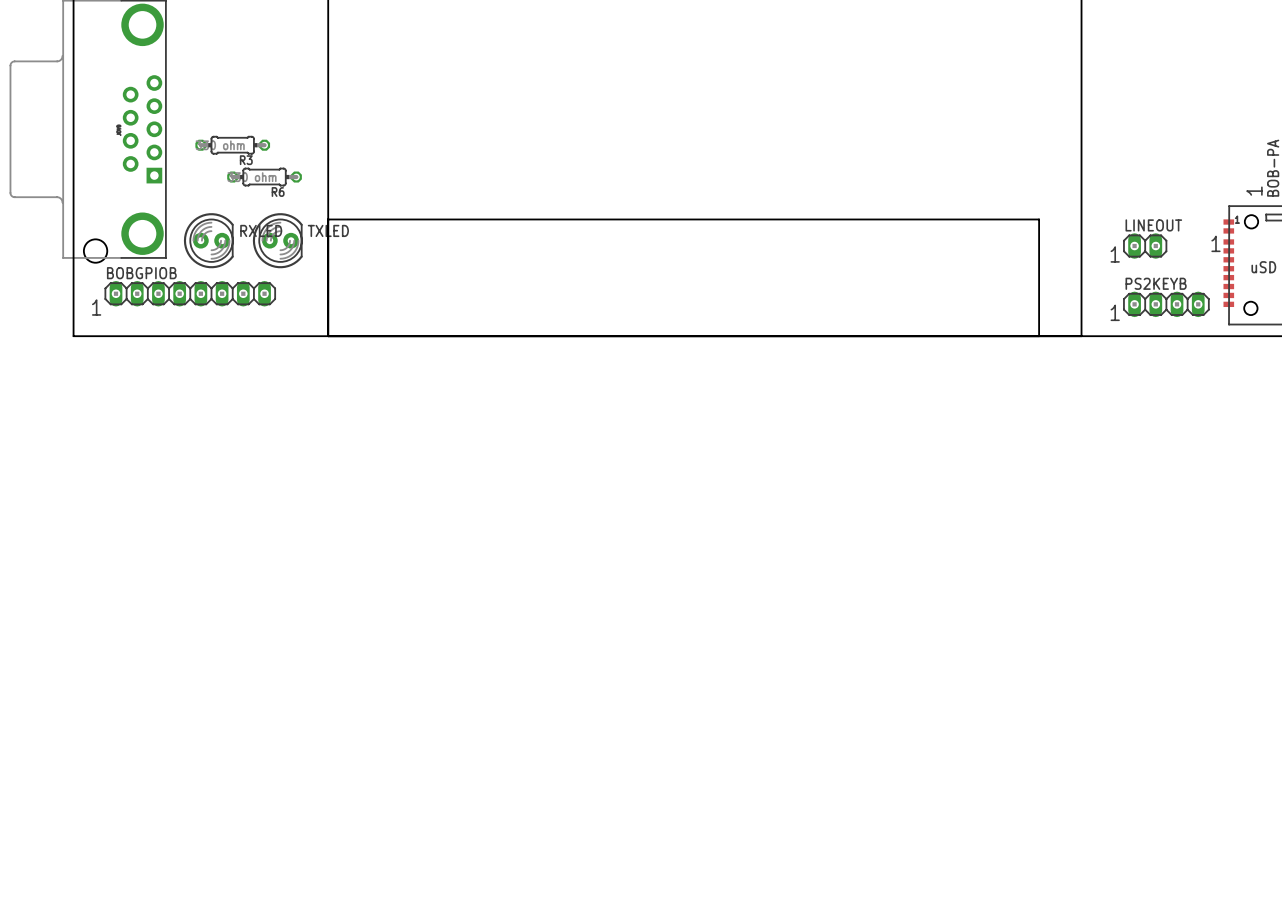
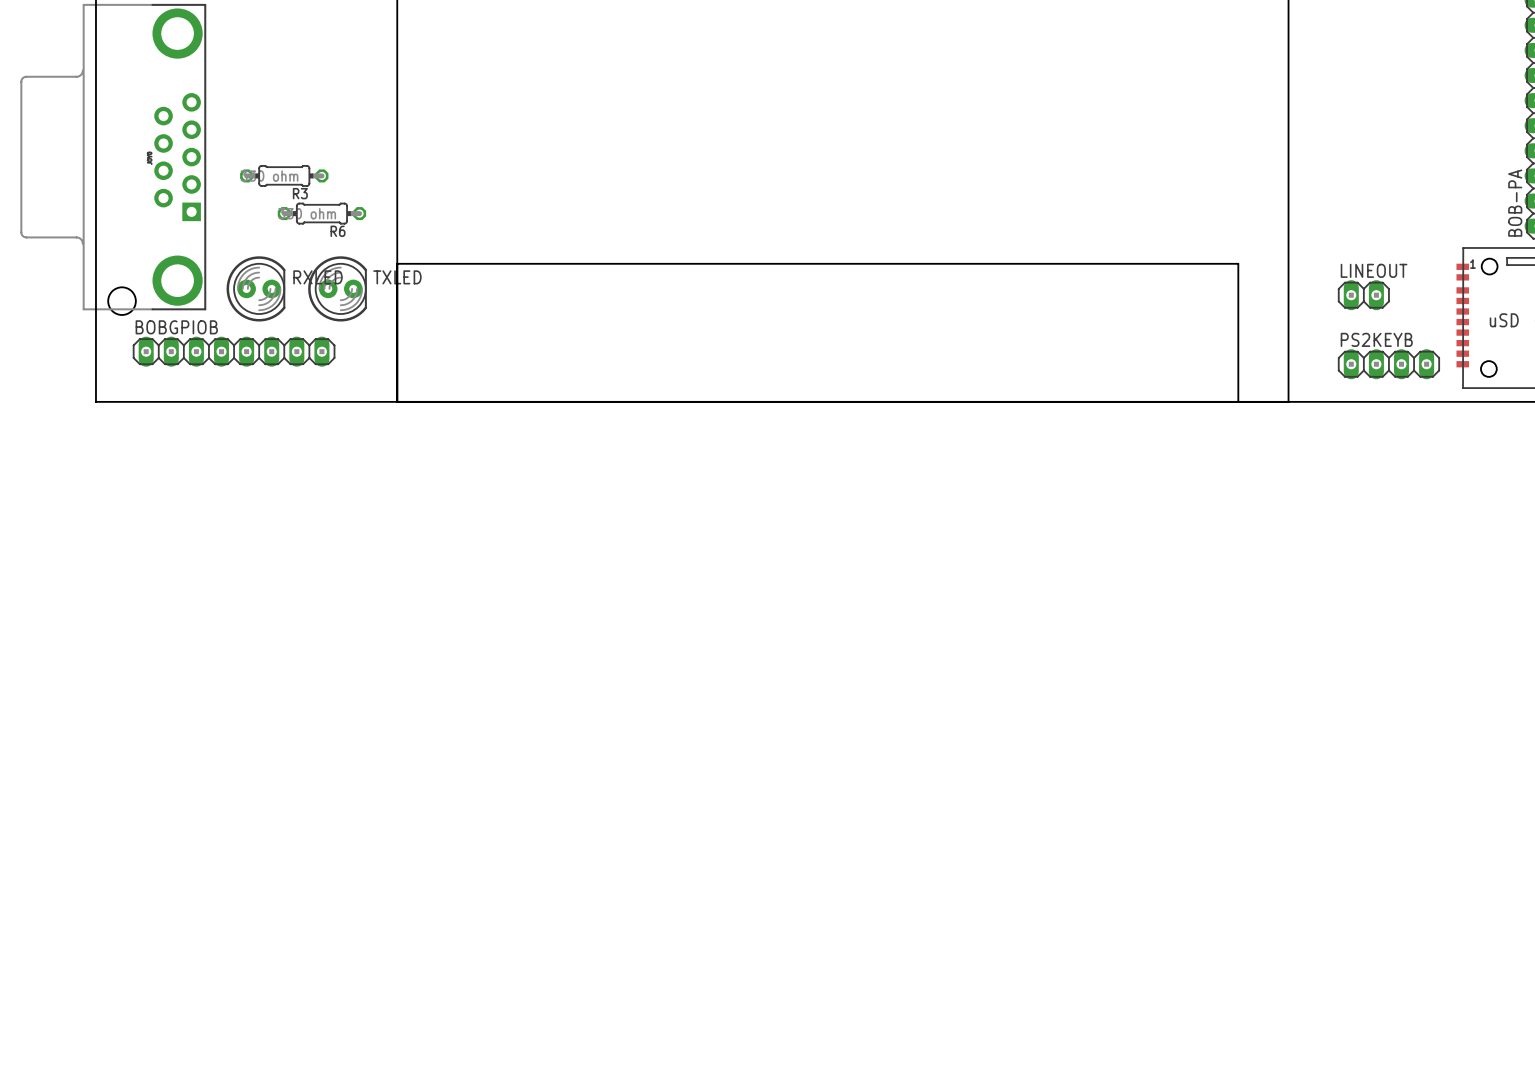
text: 1 (1254, 191) -> none
text: 1 (1215, 243) -> none
text: 1 (1115, 254) -> none
text: 1 (96, 307) -> none
text: 1 (1115, 312) -> none

